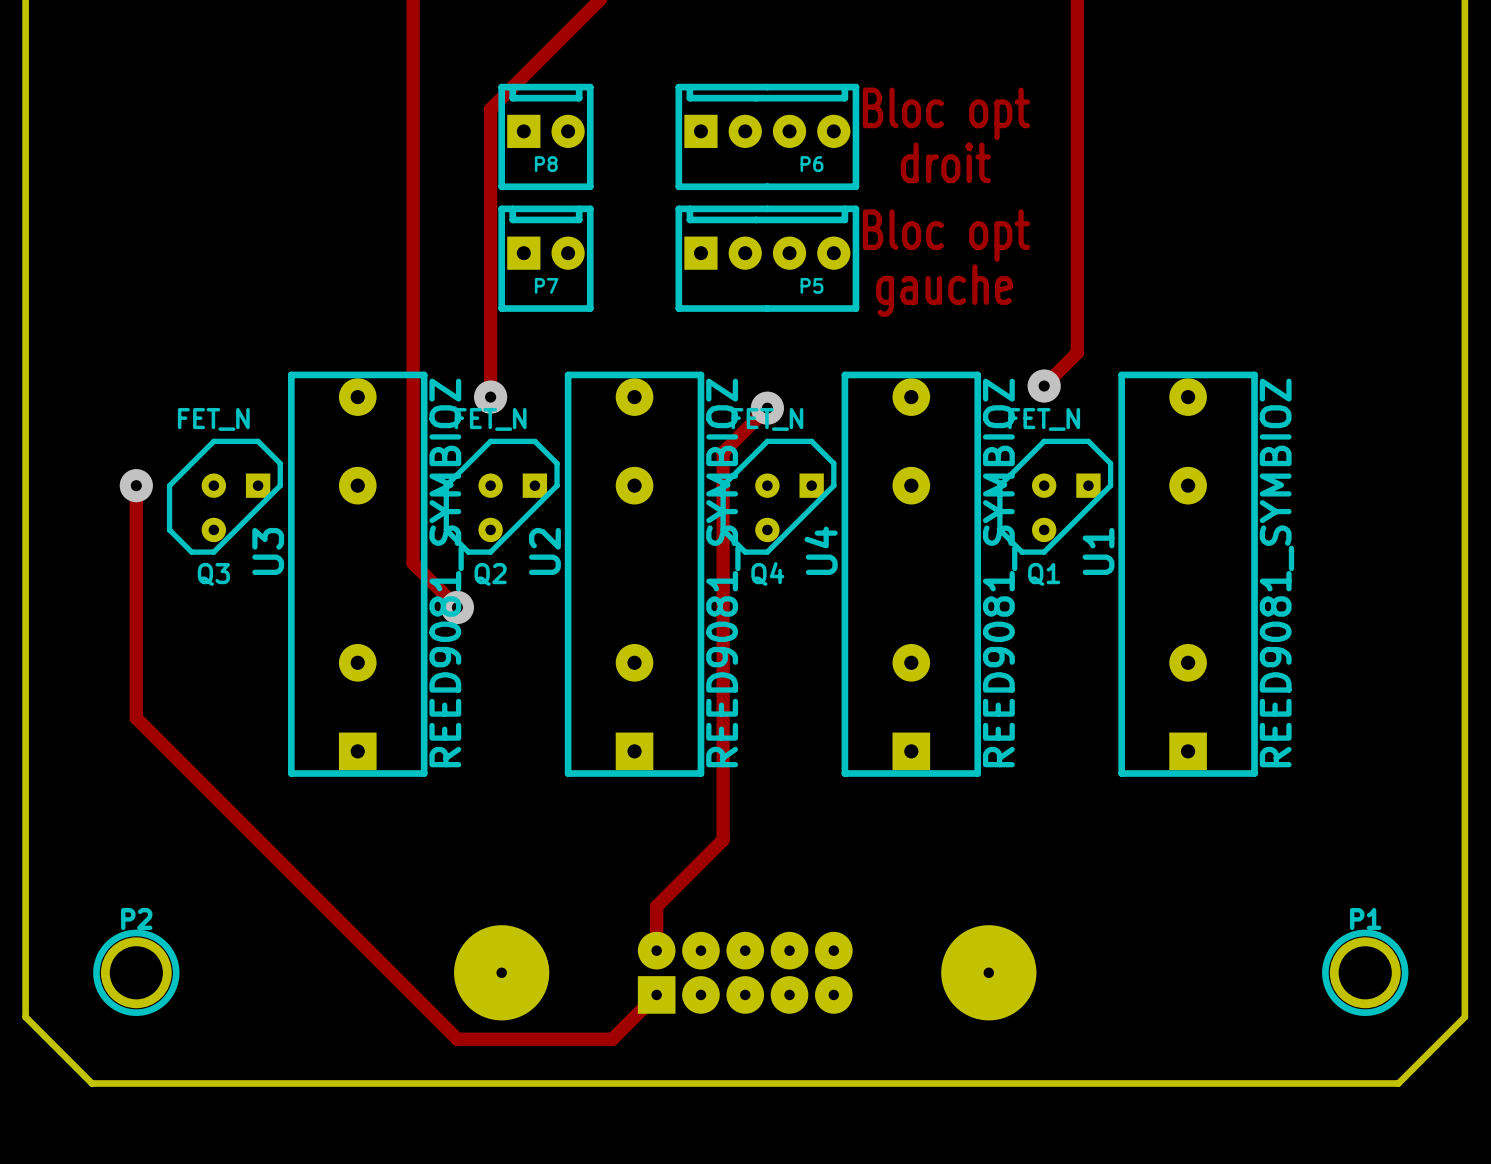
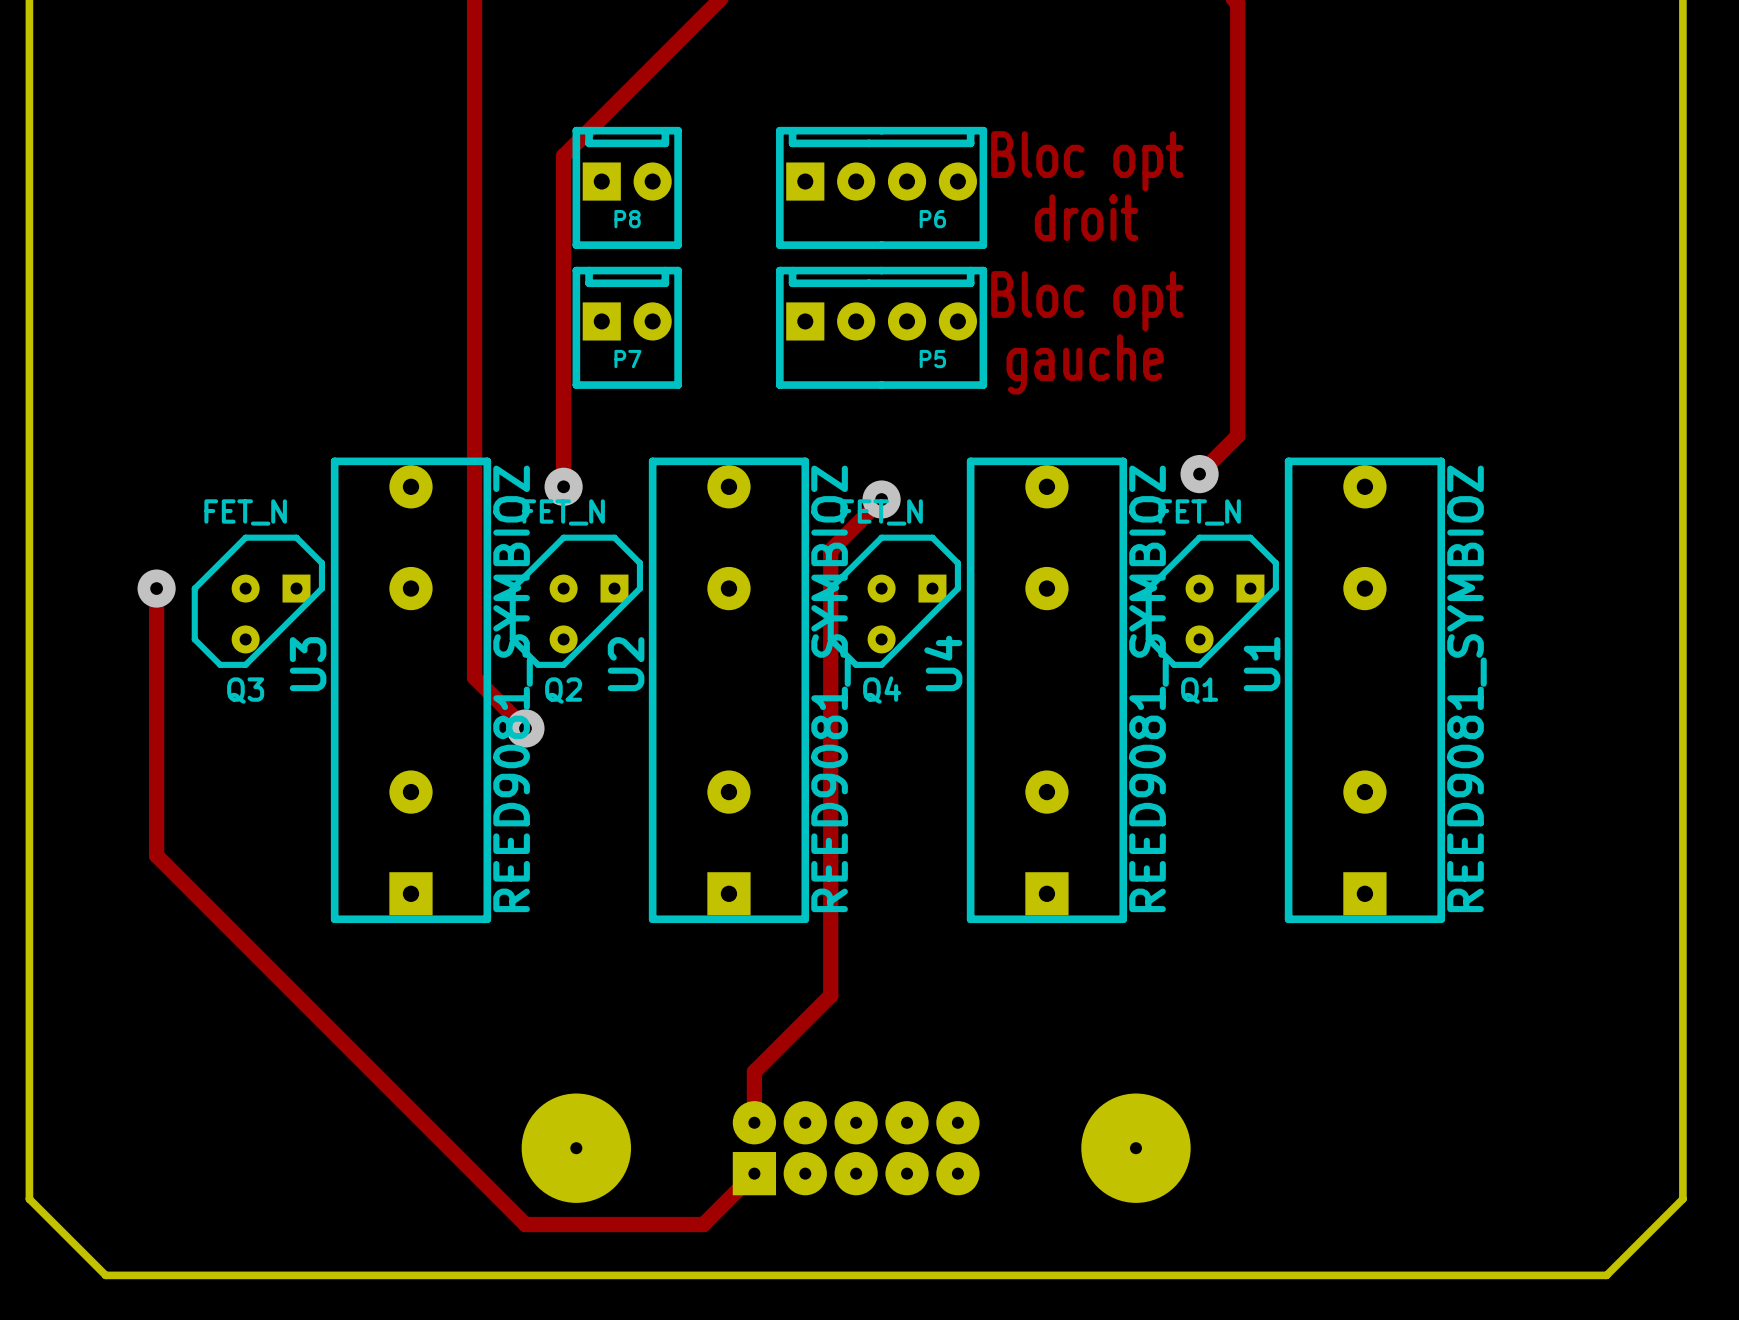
P2: (136, 972) -> none
P1: (1365, 972) -> none

